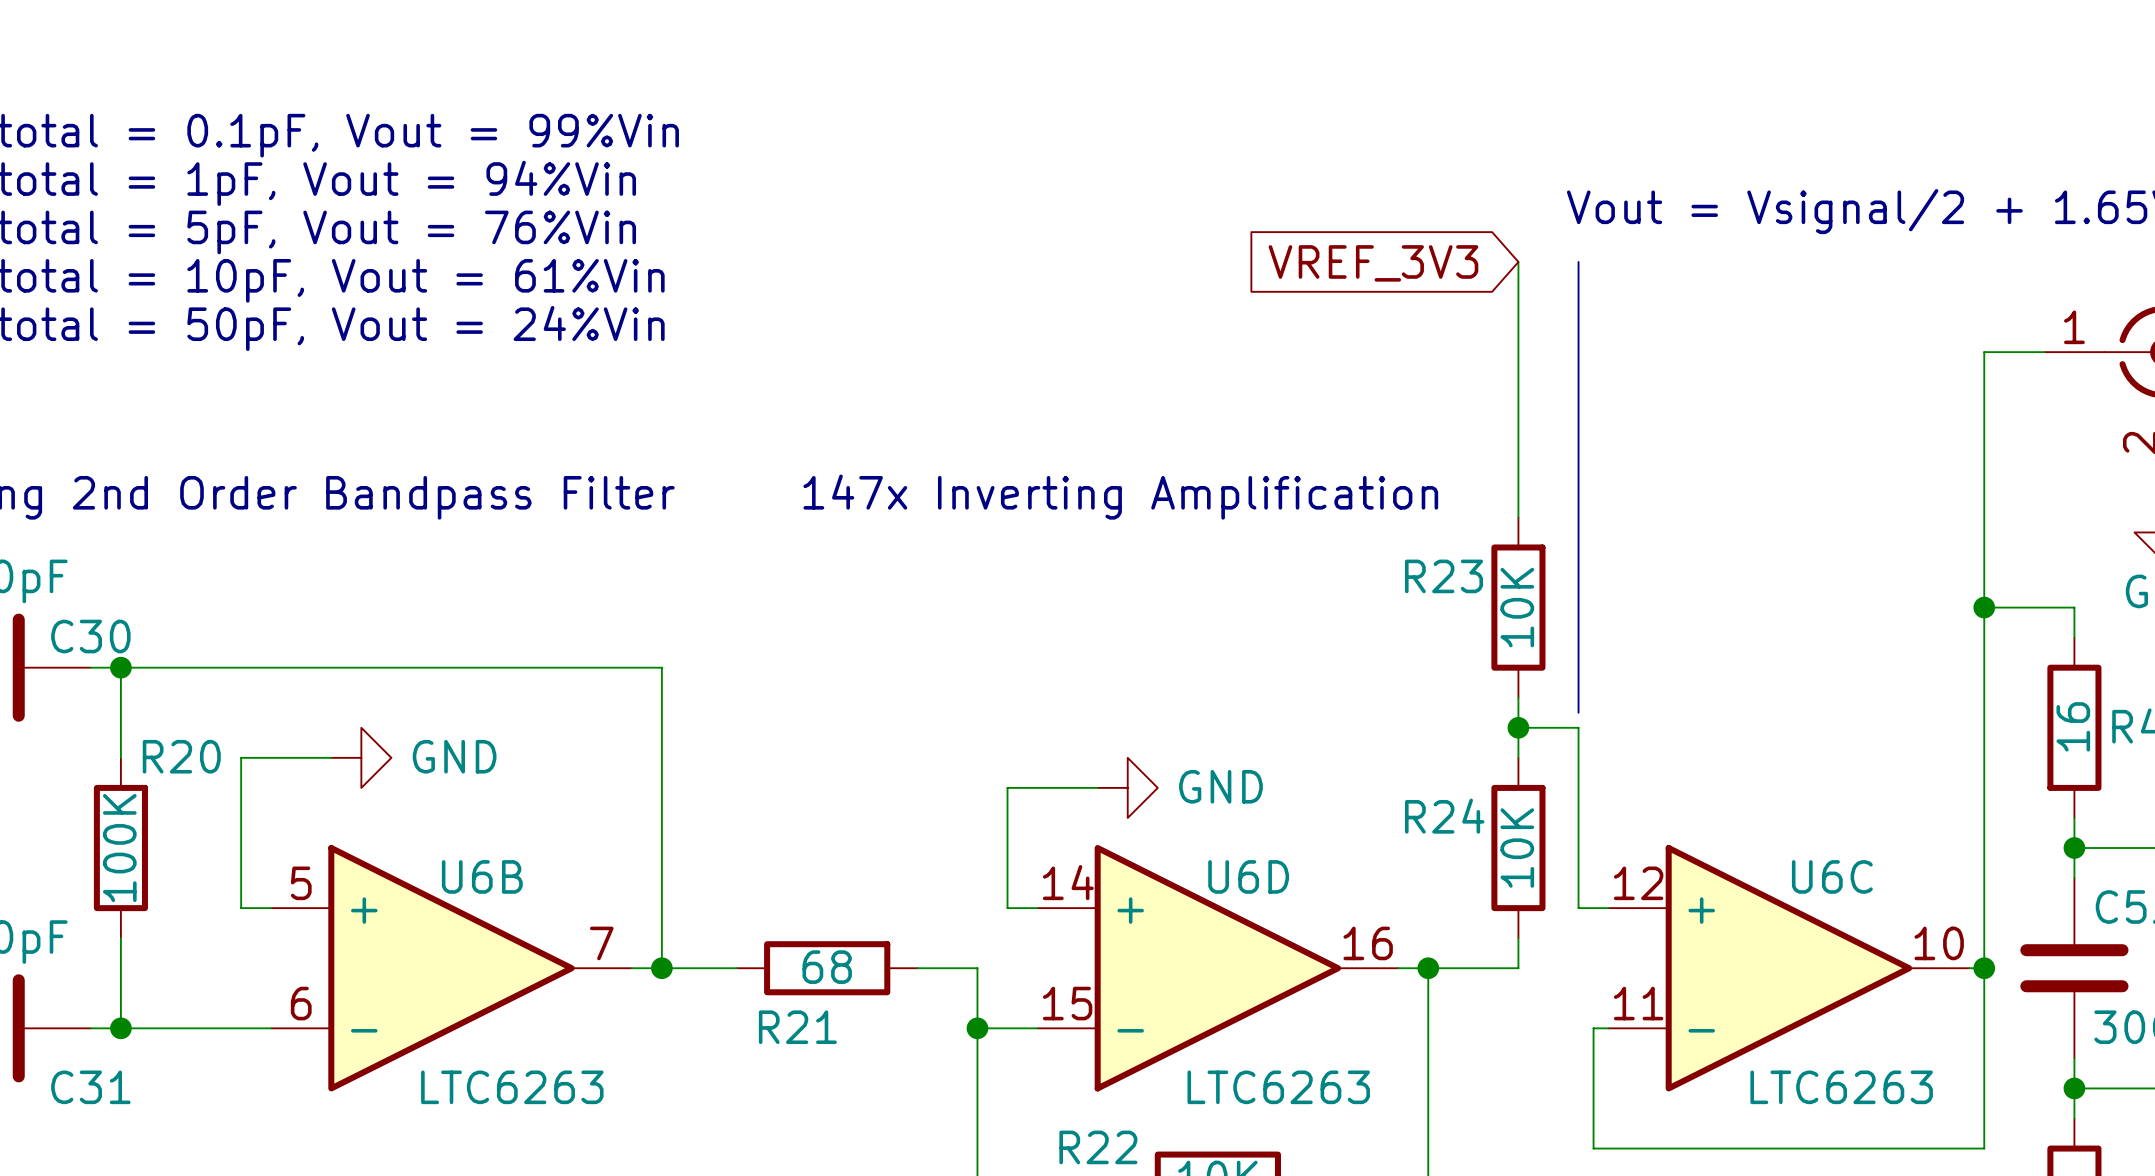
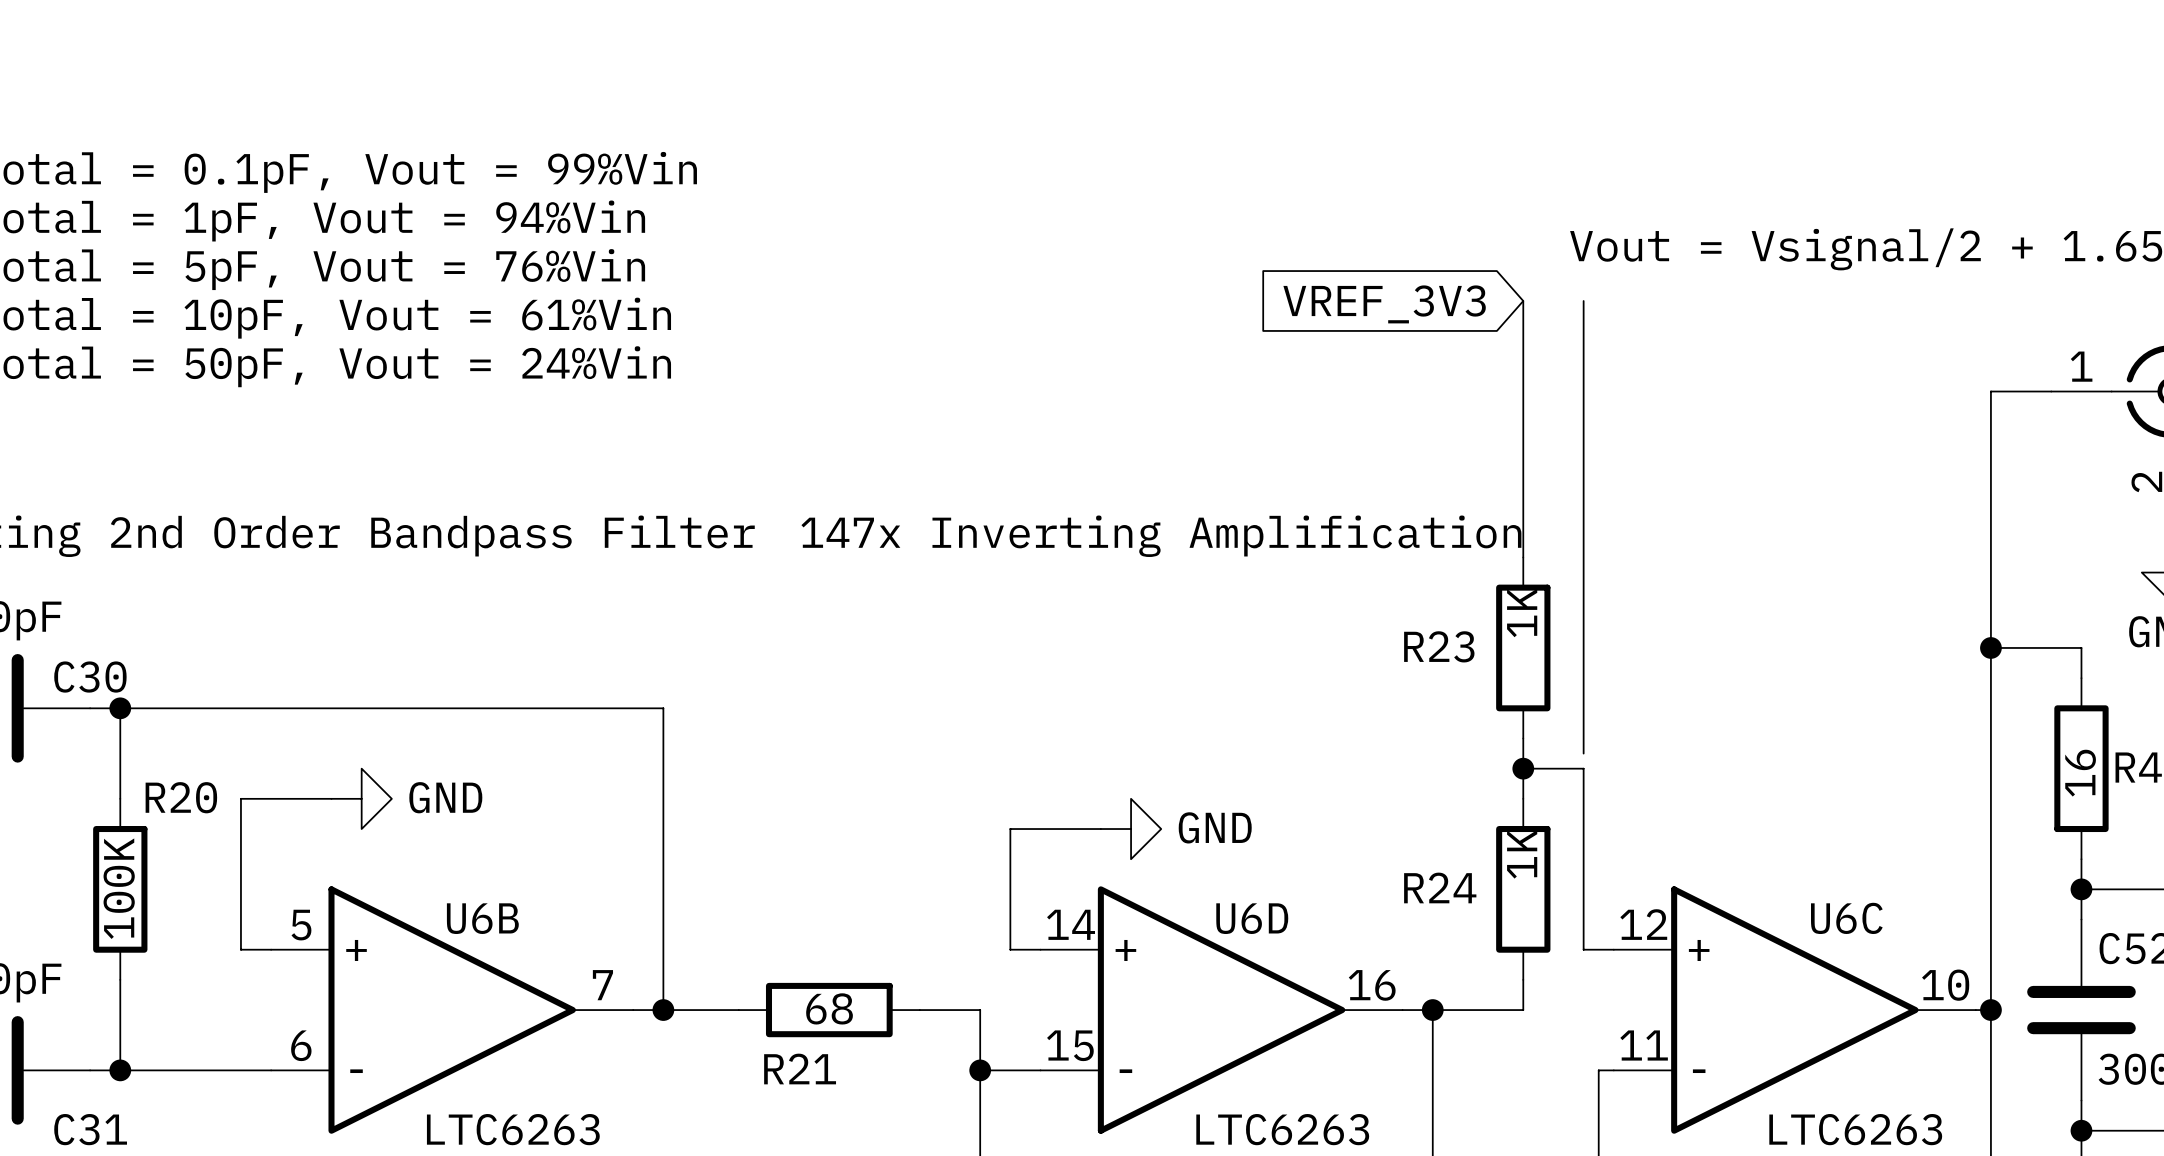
R23 name position: R23 (1444, 576) -> R23 (1439, 646)
R23 value: 10K (1517, 607) -> 1K (1522, 612)
R24 name position: R24 (1444, 816) -> R24 (1440, 887)
R24 value: 10K (1517, 848) -> 1K (1522, 854)

